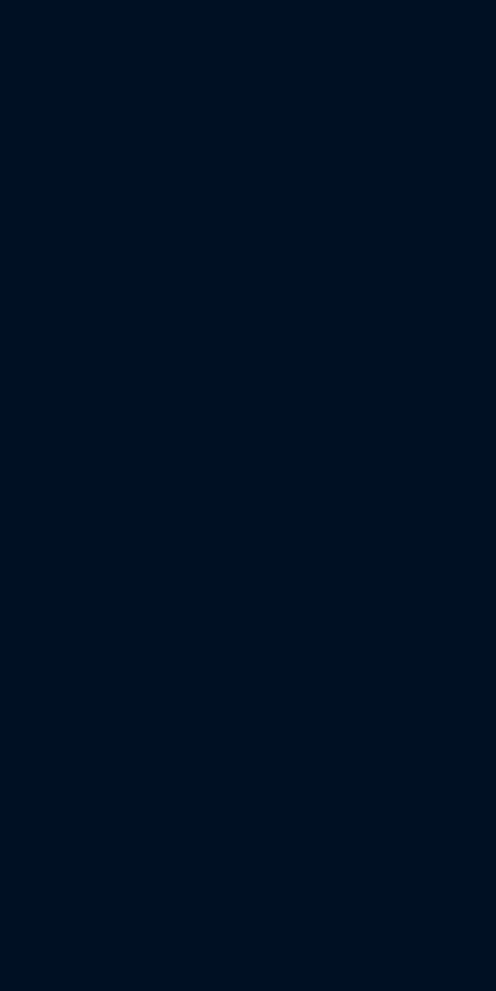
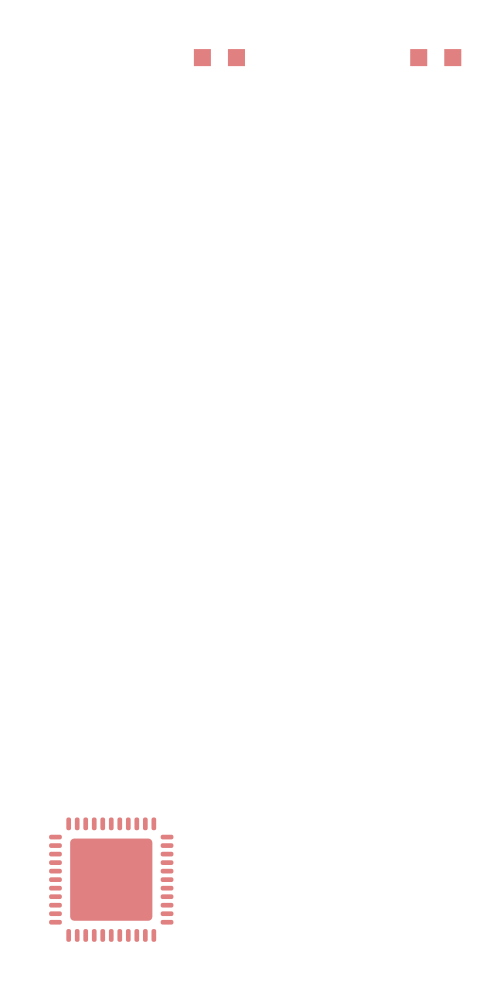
part: none -> (219, 57)
part: none -> (435, 57)
part: none -> (111, 879)

